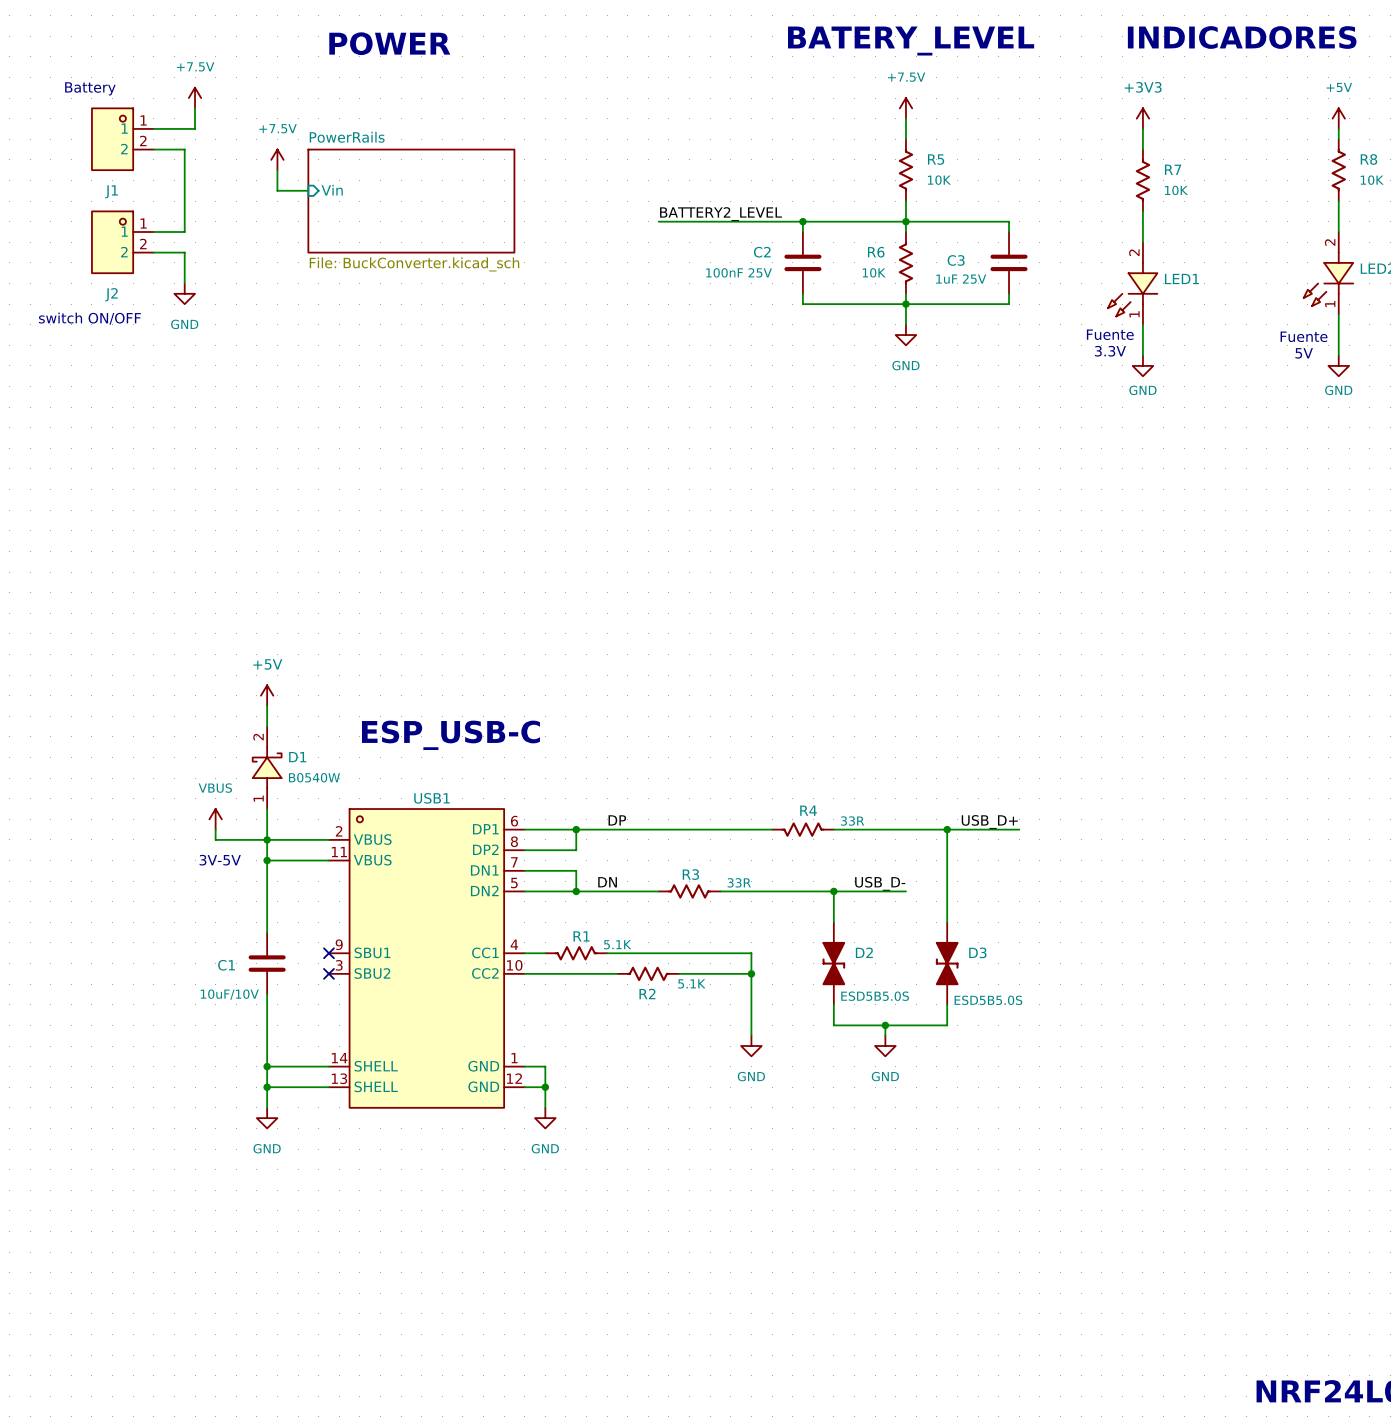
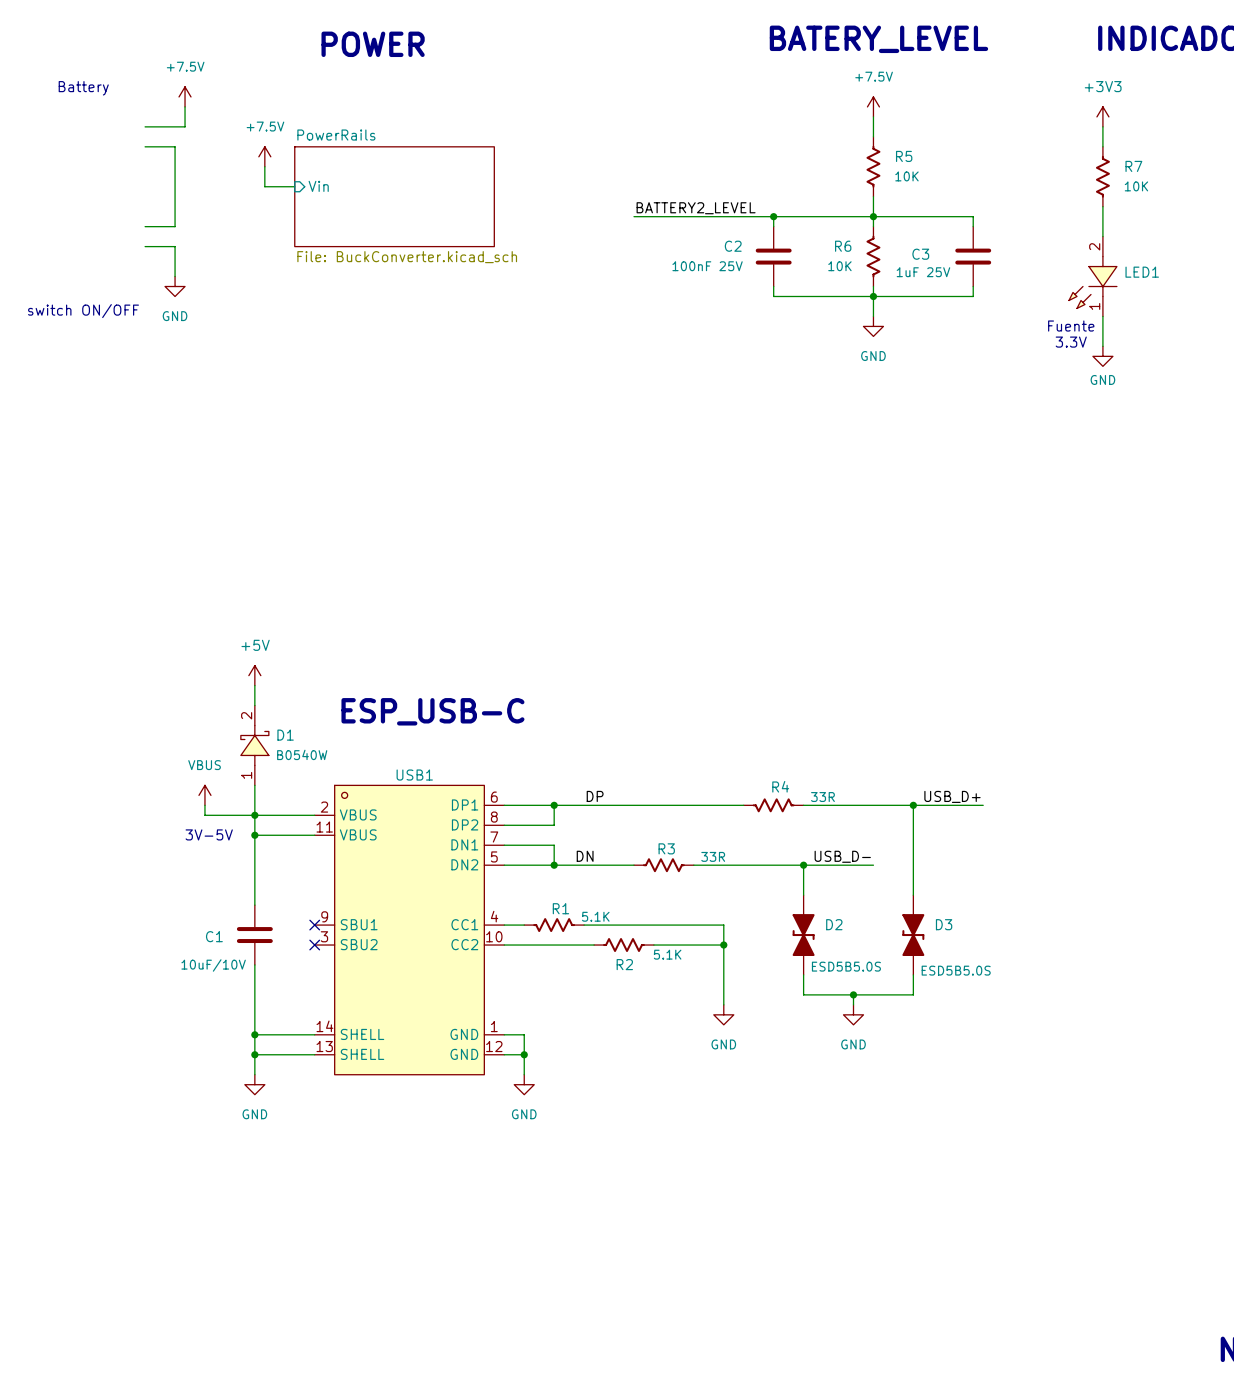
J1: (122, 139) -> none
J2: (122, 242) -> none

